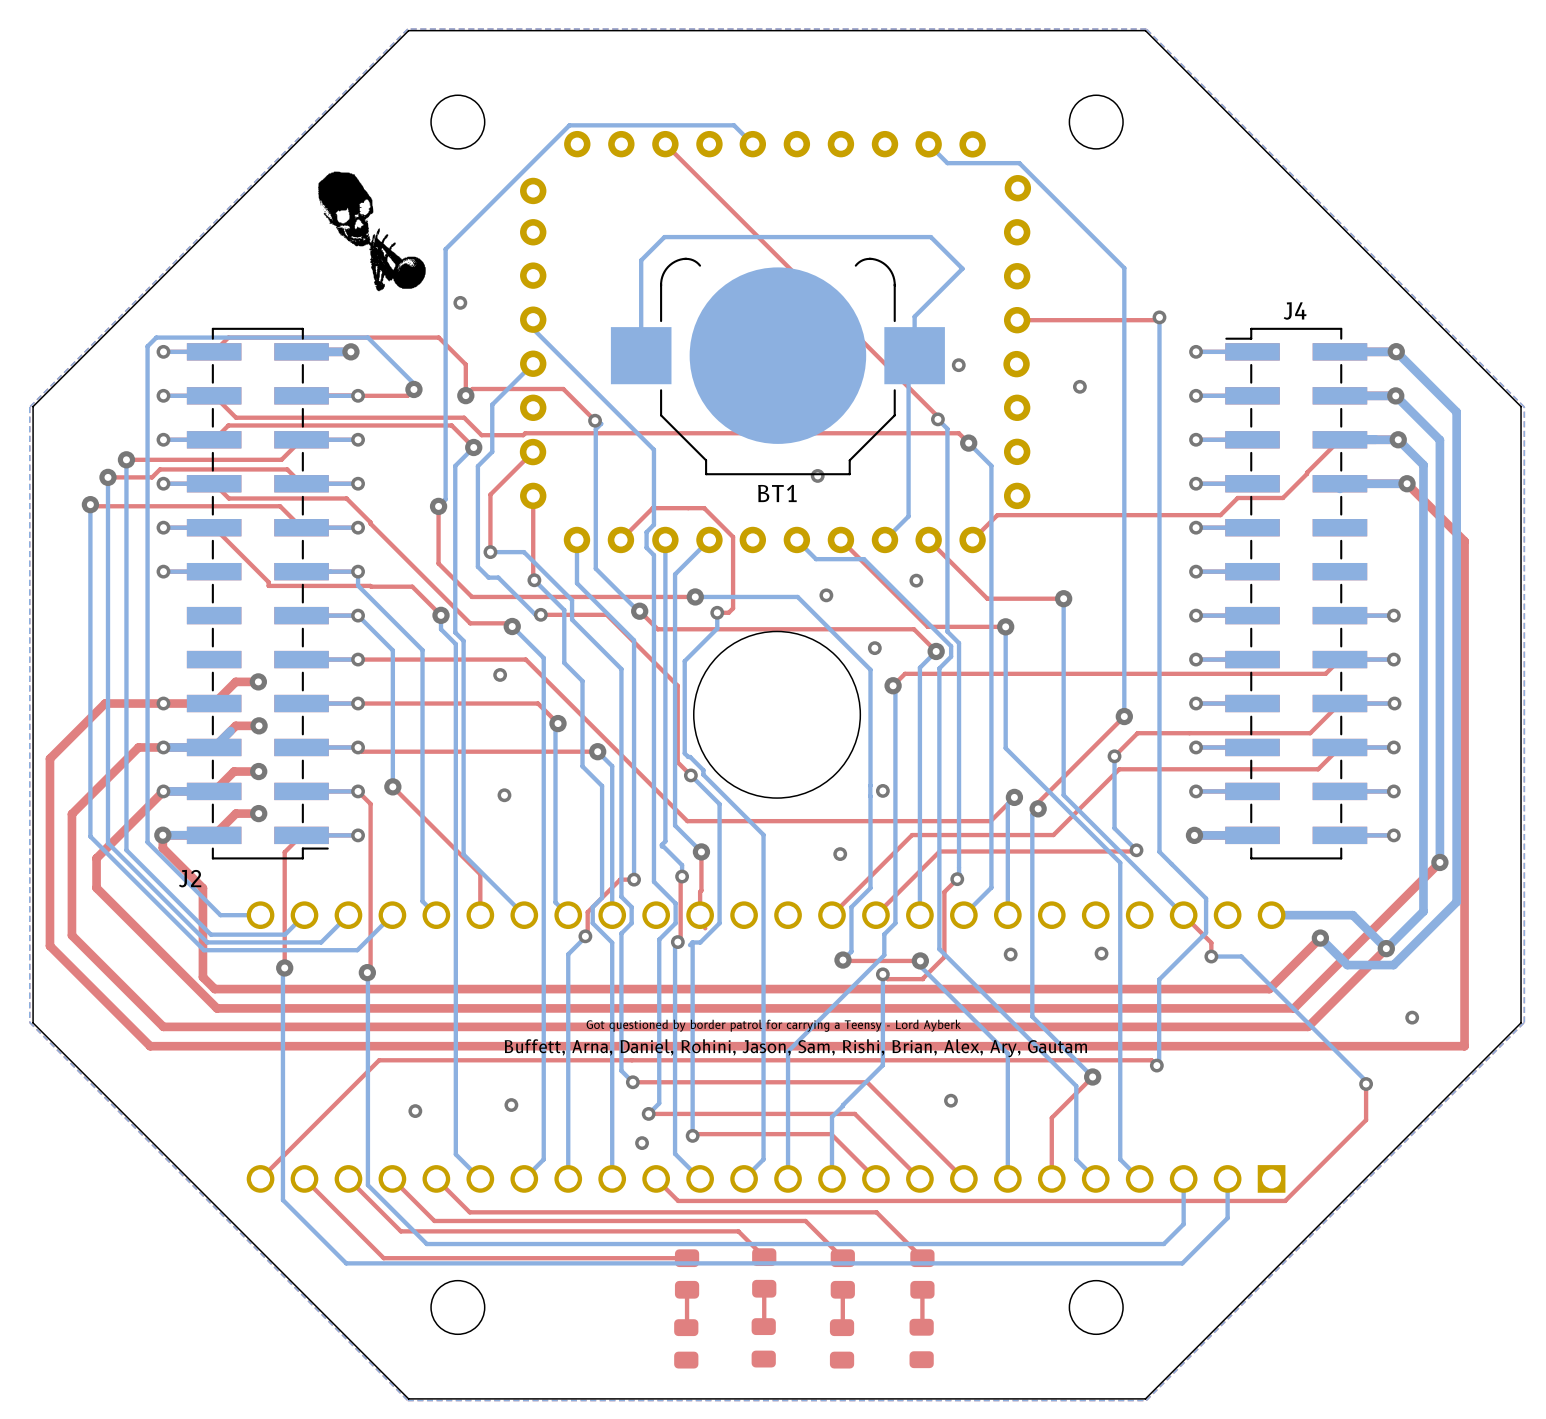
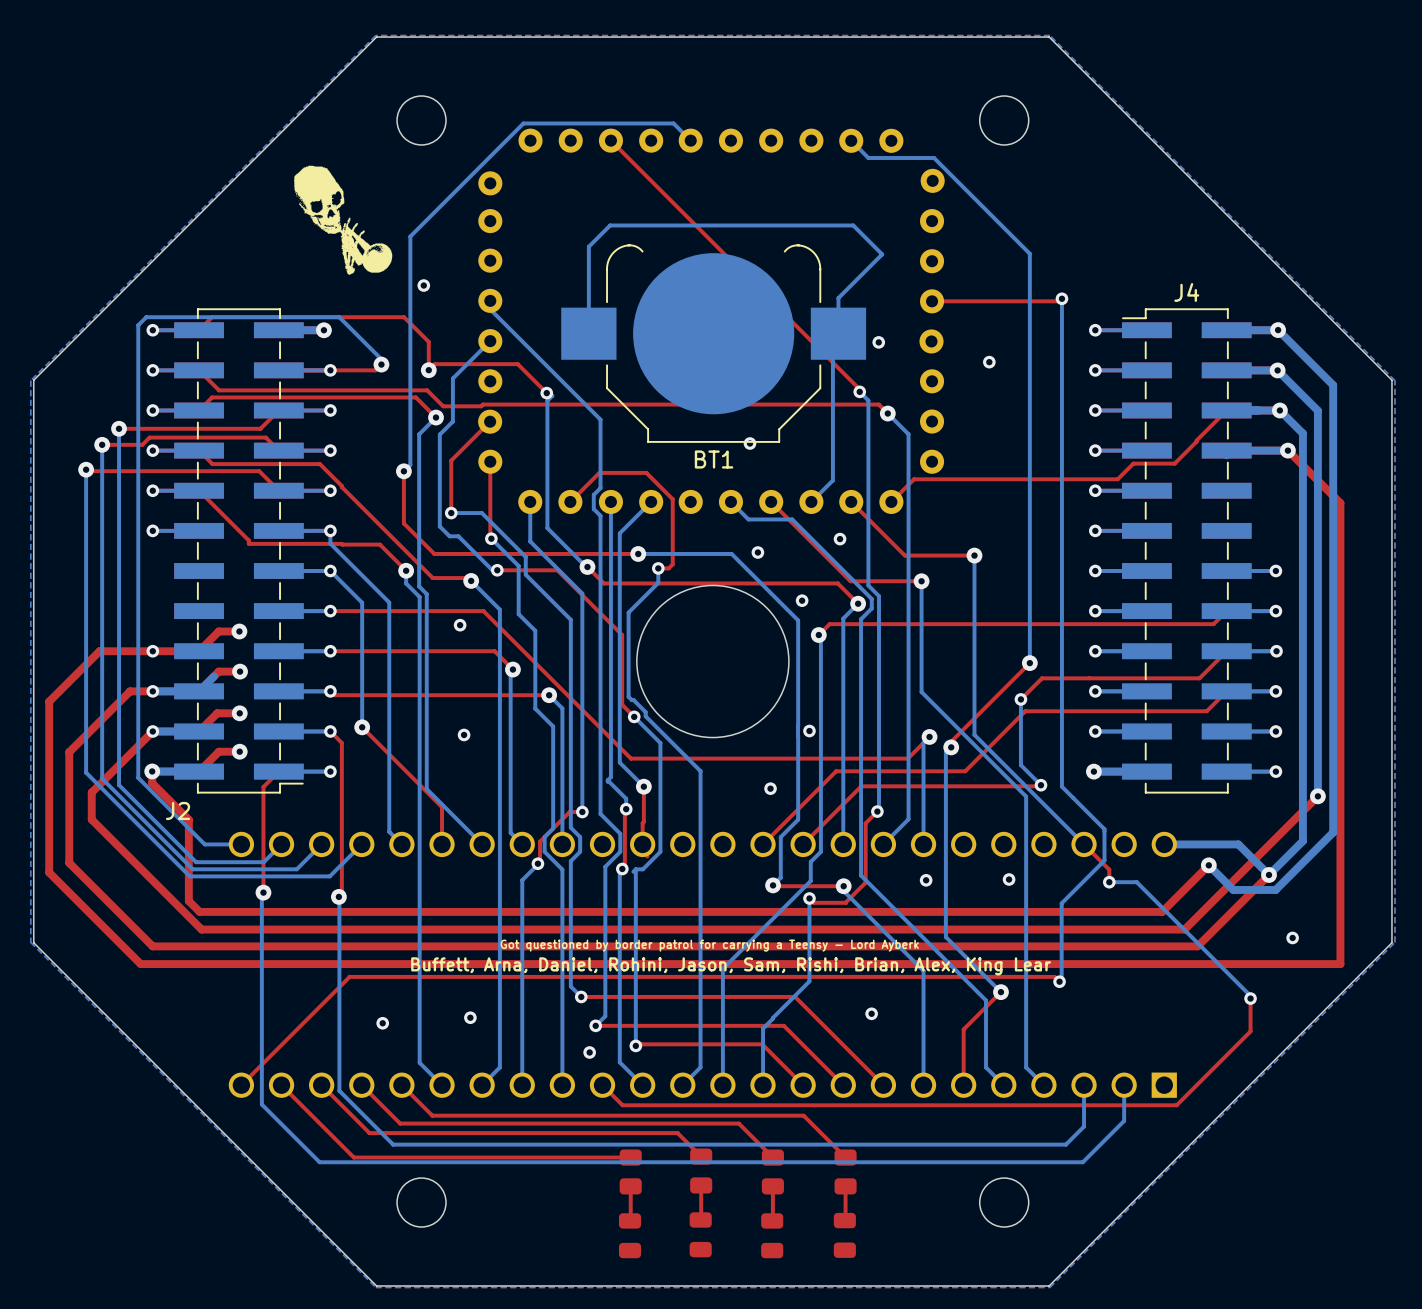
text: Buffett, Arna, Daniel, Rohini, Jason, Sam, Rishi, Brian, Alex, Ary, Gautam (795, 1048) -> Buffett, Arna, Daniel, Rohini, Jason, Sam, Rishi, Brian, Alex, King Lear (731, 966)

